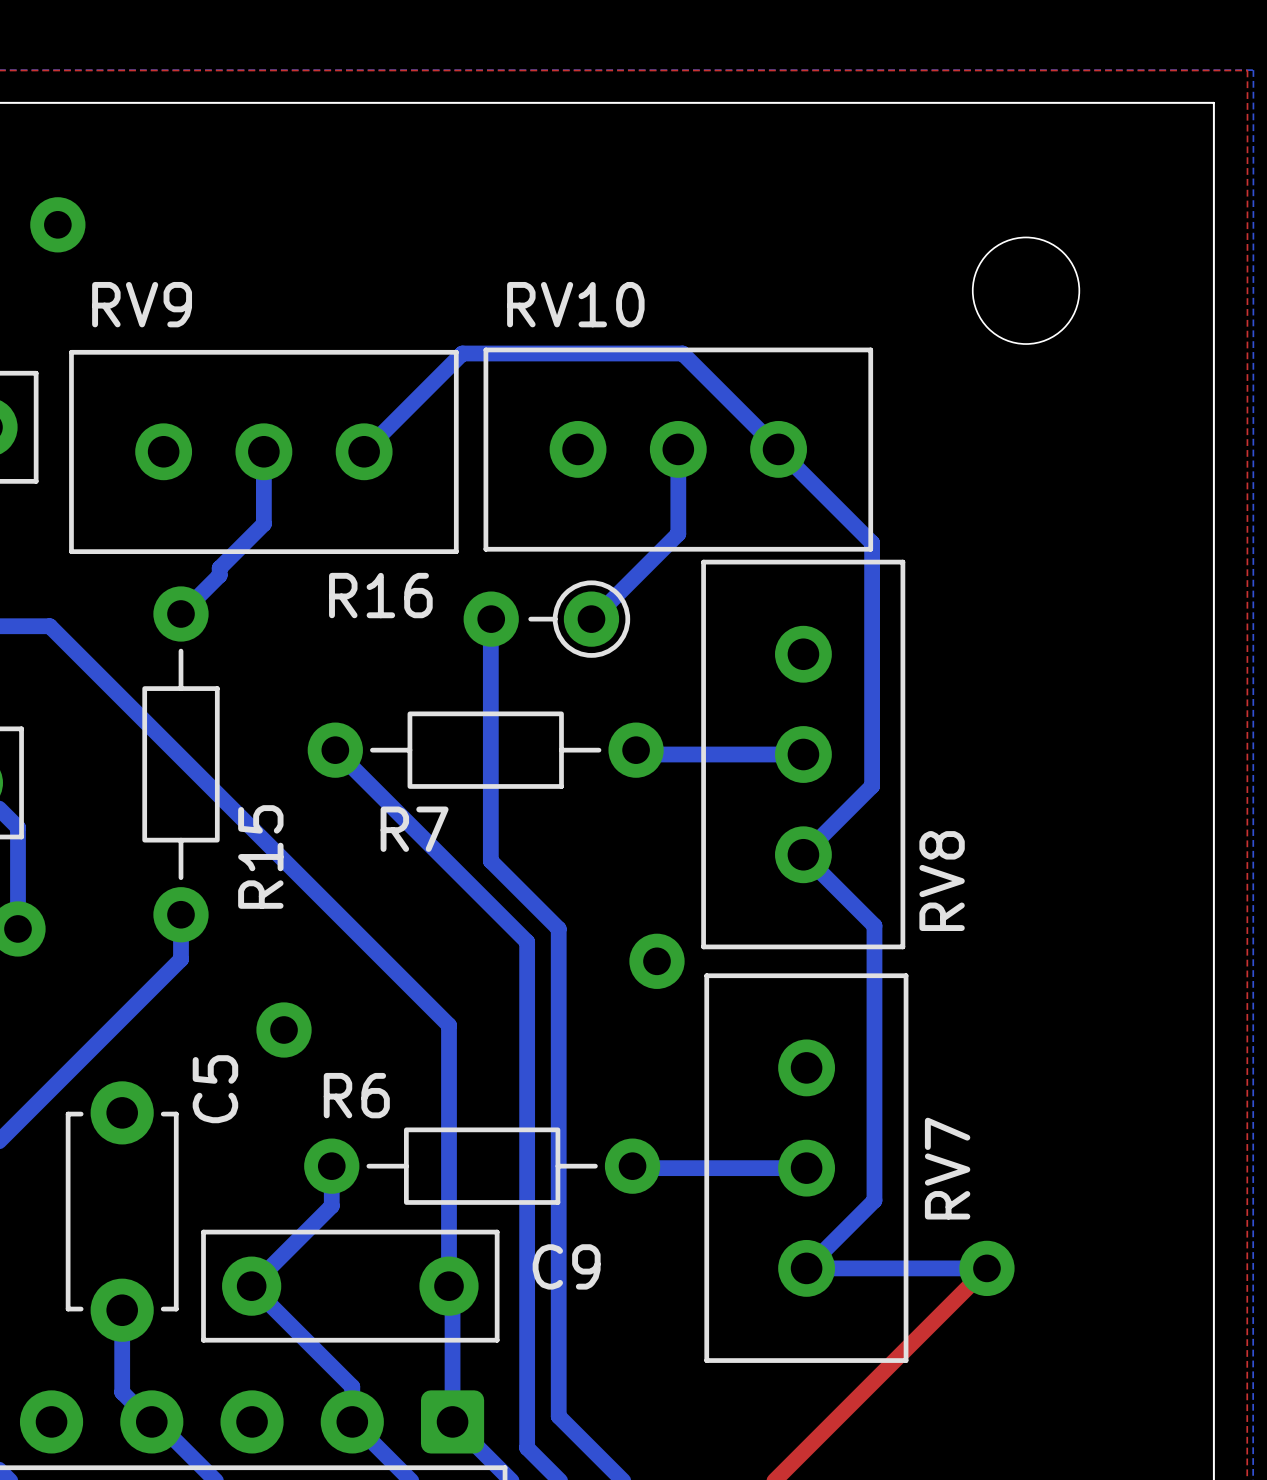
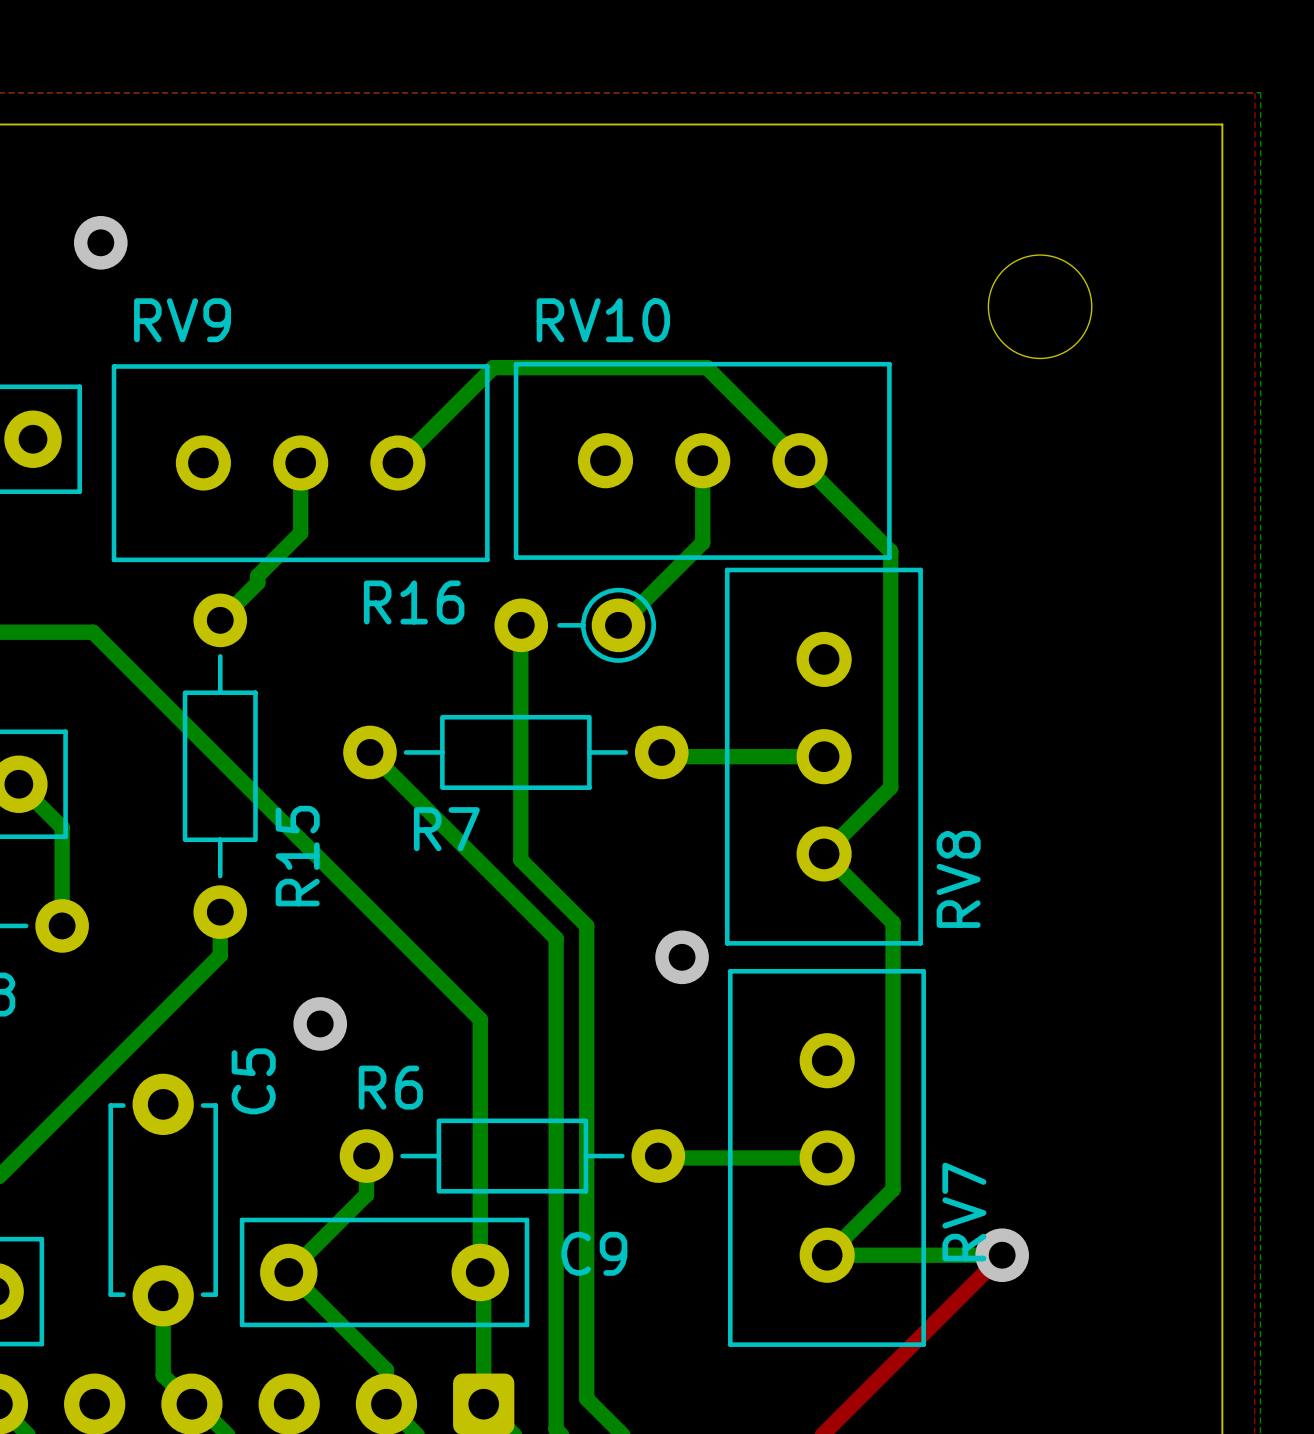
RV7 name position: RV7 (947, 1168) -> RV7 (964, 1212)

